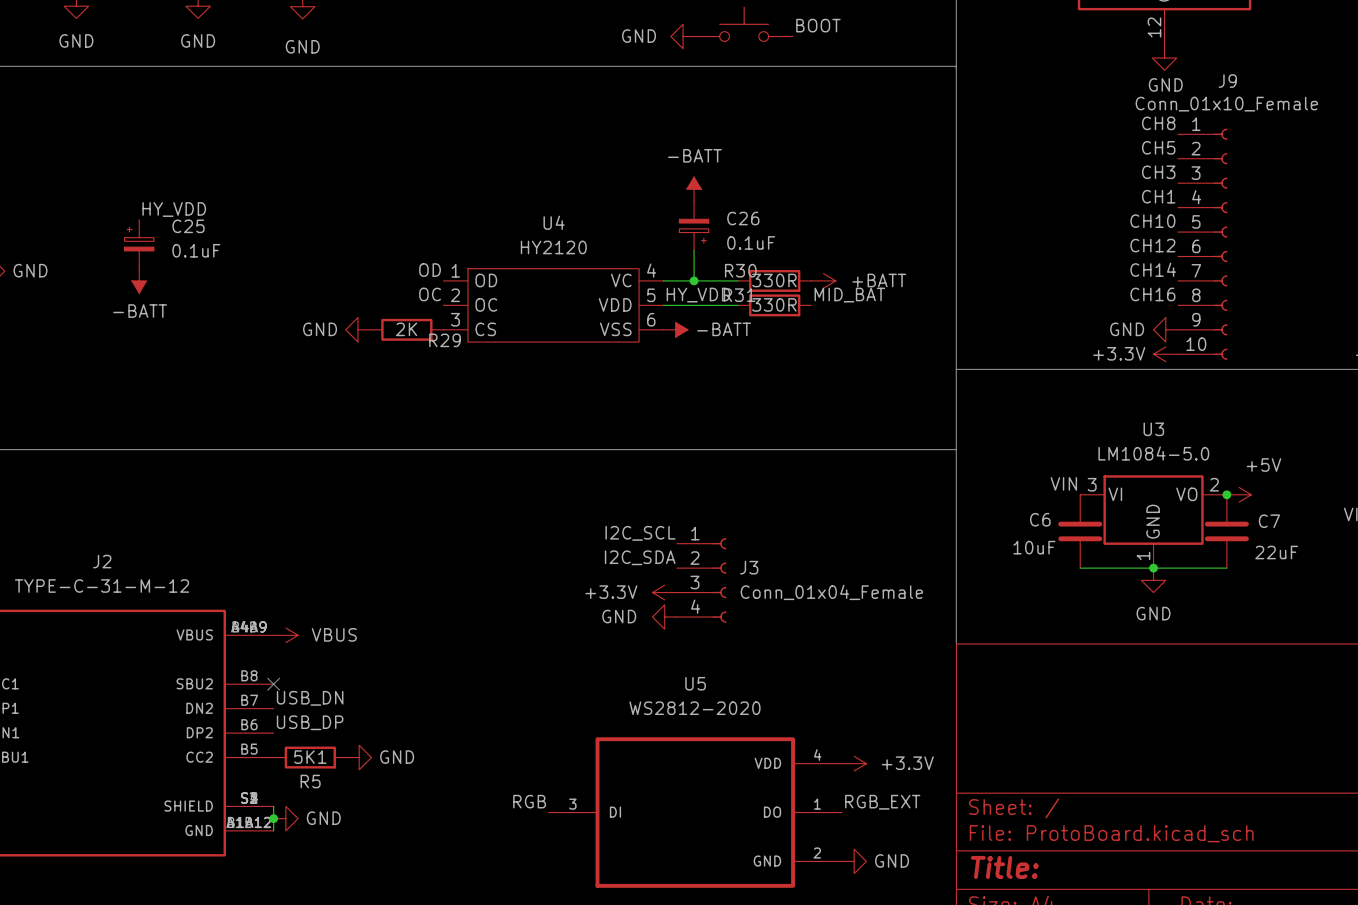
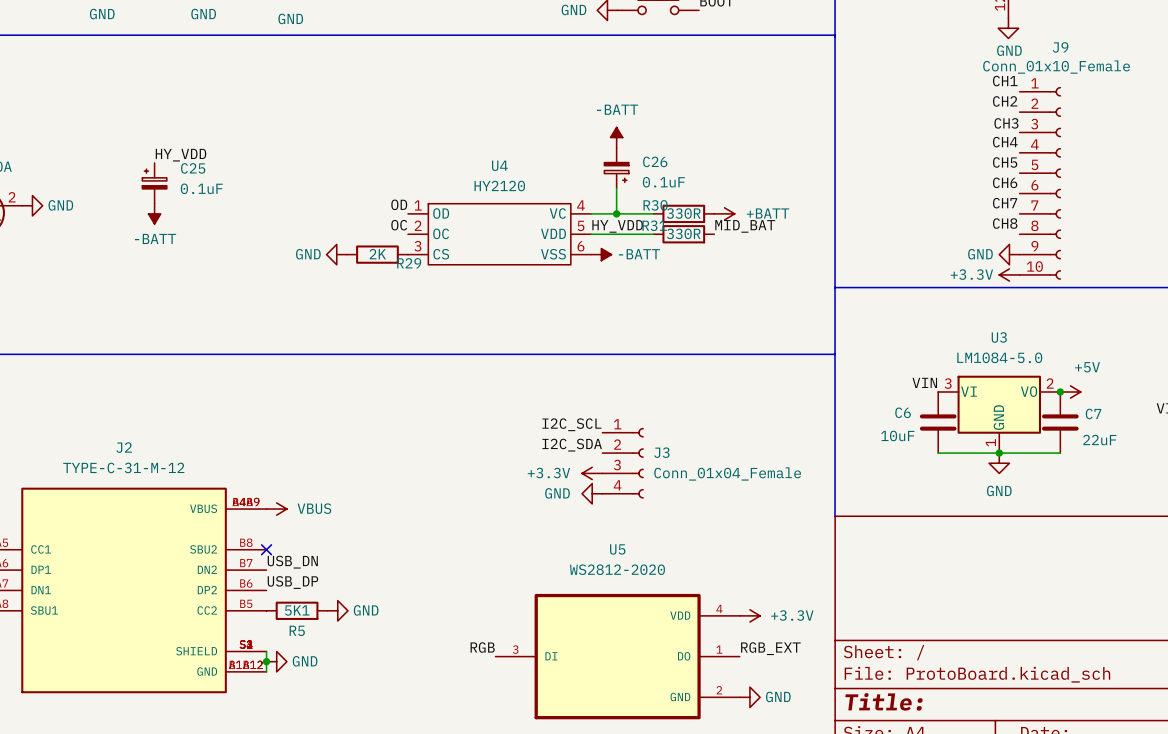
label: CH8 (1158, 123) -> CH1 (1005, 81)
label: CH5 (1158, 147) -> CH2 (1005, 101)
label: CH1 (1158, 196) -> CH4 (1005, 142)
label: CH10 (1152, 221) -> CH5 (1005, 162)
label: CH12 (1152, 245) -> CH6 (1005, 182)
label: CH14 (1153, 269) -> CH7 (1005, 203)
label: CH16 (1152, 294) -> CH8 (1005, 223)

